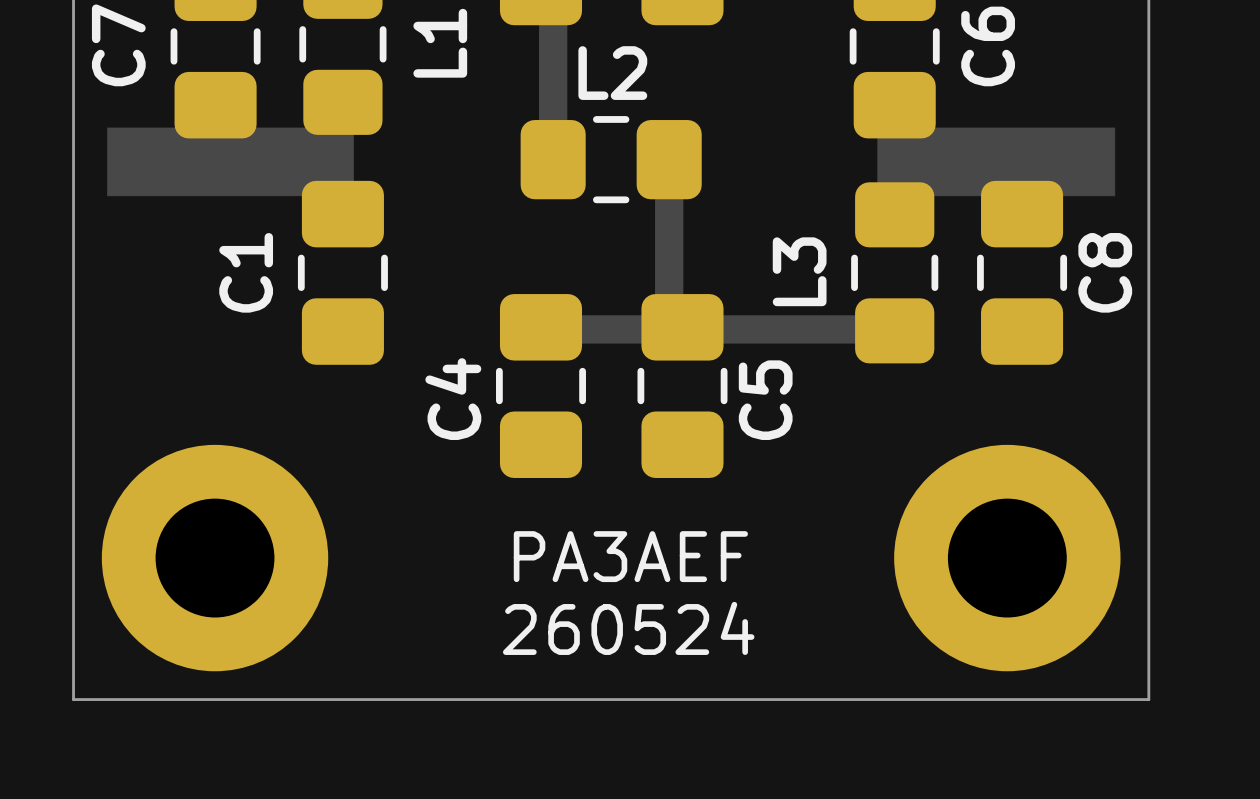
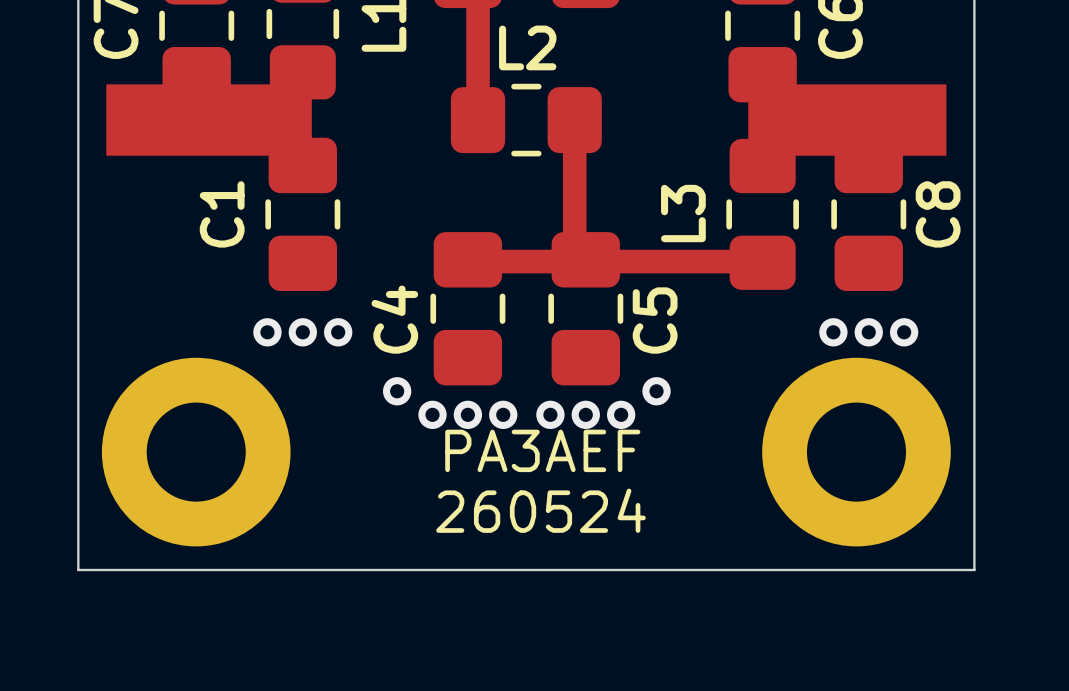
drawing shape: [107, 127, 354, 197] -> [106, 84, 312, 156]
drawing shape: [877, 127, 1116, 197] -> [748, 84, 947, 156]
via: none -> (267, 332)
via: none -> (302, 332)
via: none -> (338, 332)
via: none -> (833, 332)
via: none -> (868, 332)
via: none -> (904, 332)
via: none -> (397, 391)
via: none -> (656, 391)
via: none -> (432, 414)
via: none -> (467, 414)
via: none -> (503, 414)
via: none -> (550, 414)
via: none -> (585, 414)
via: none -> (621, 414)

